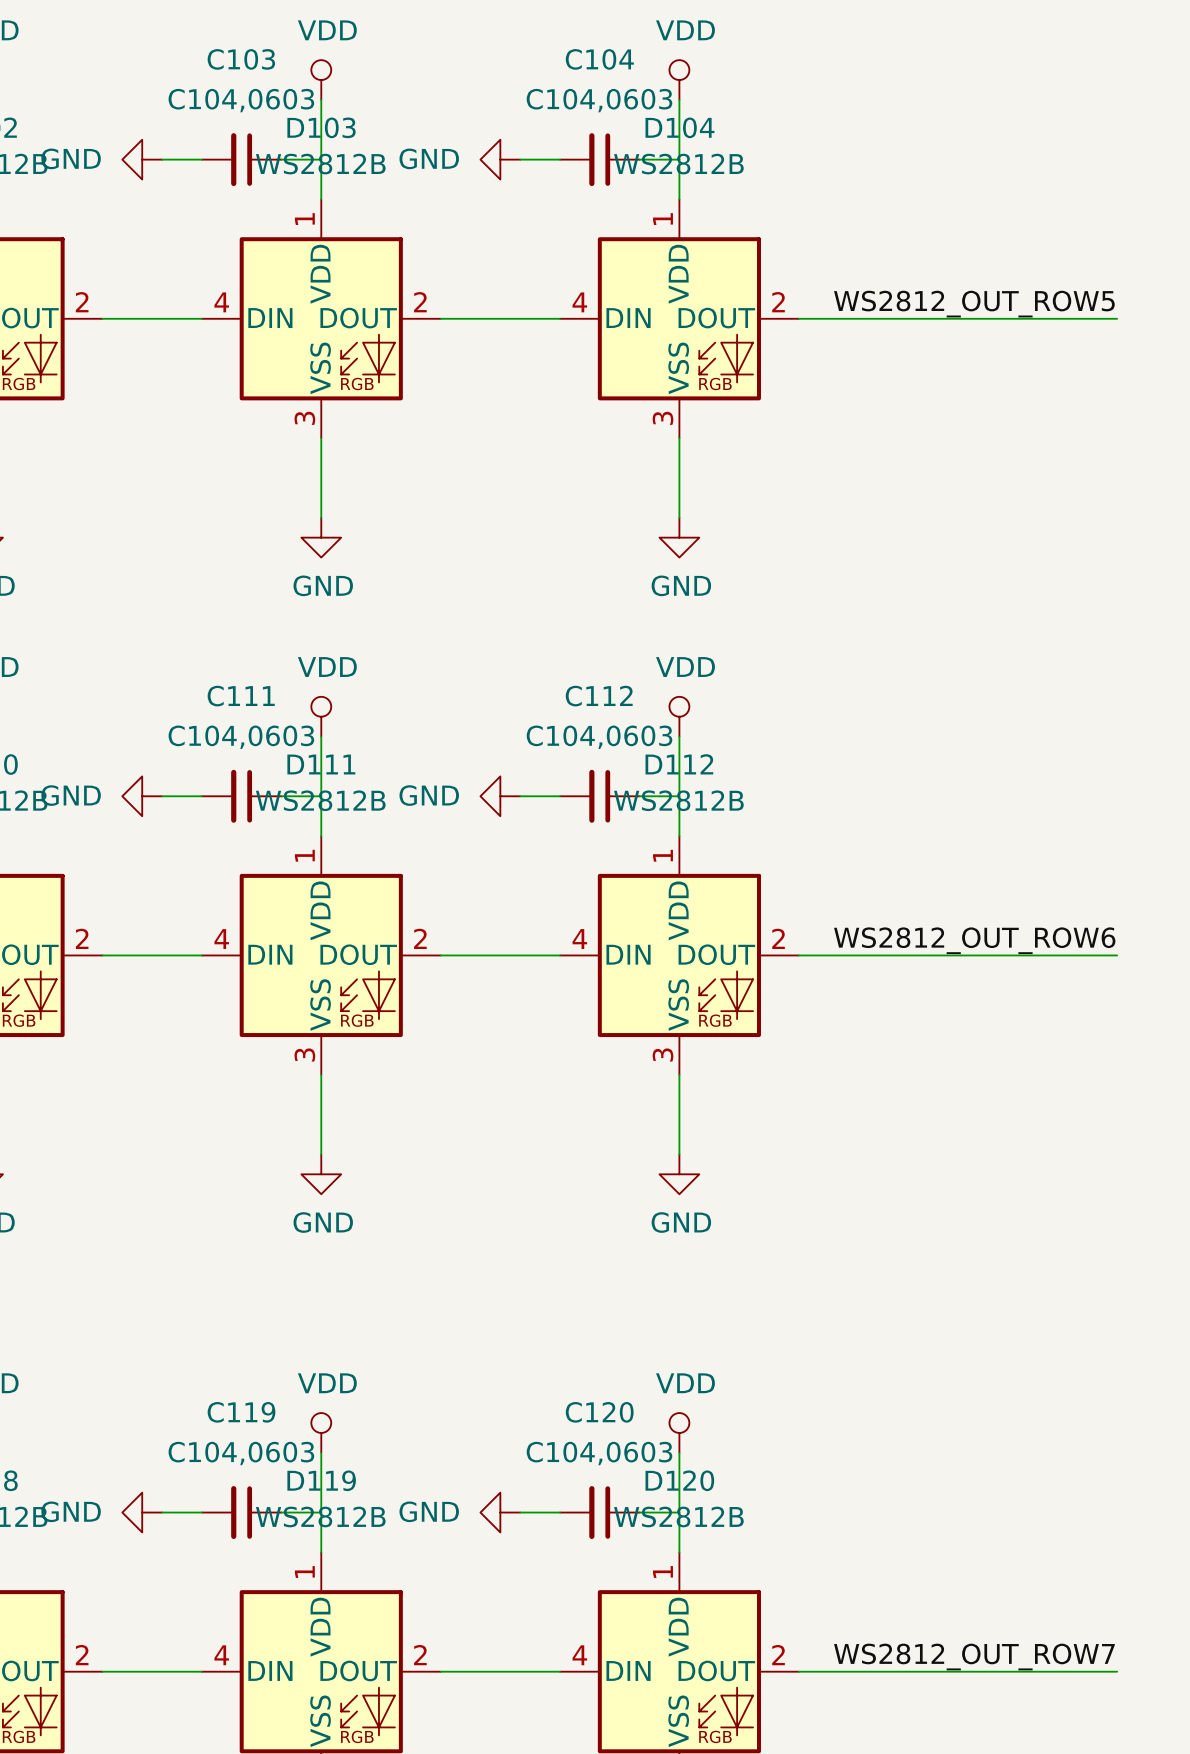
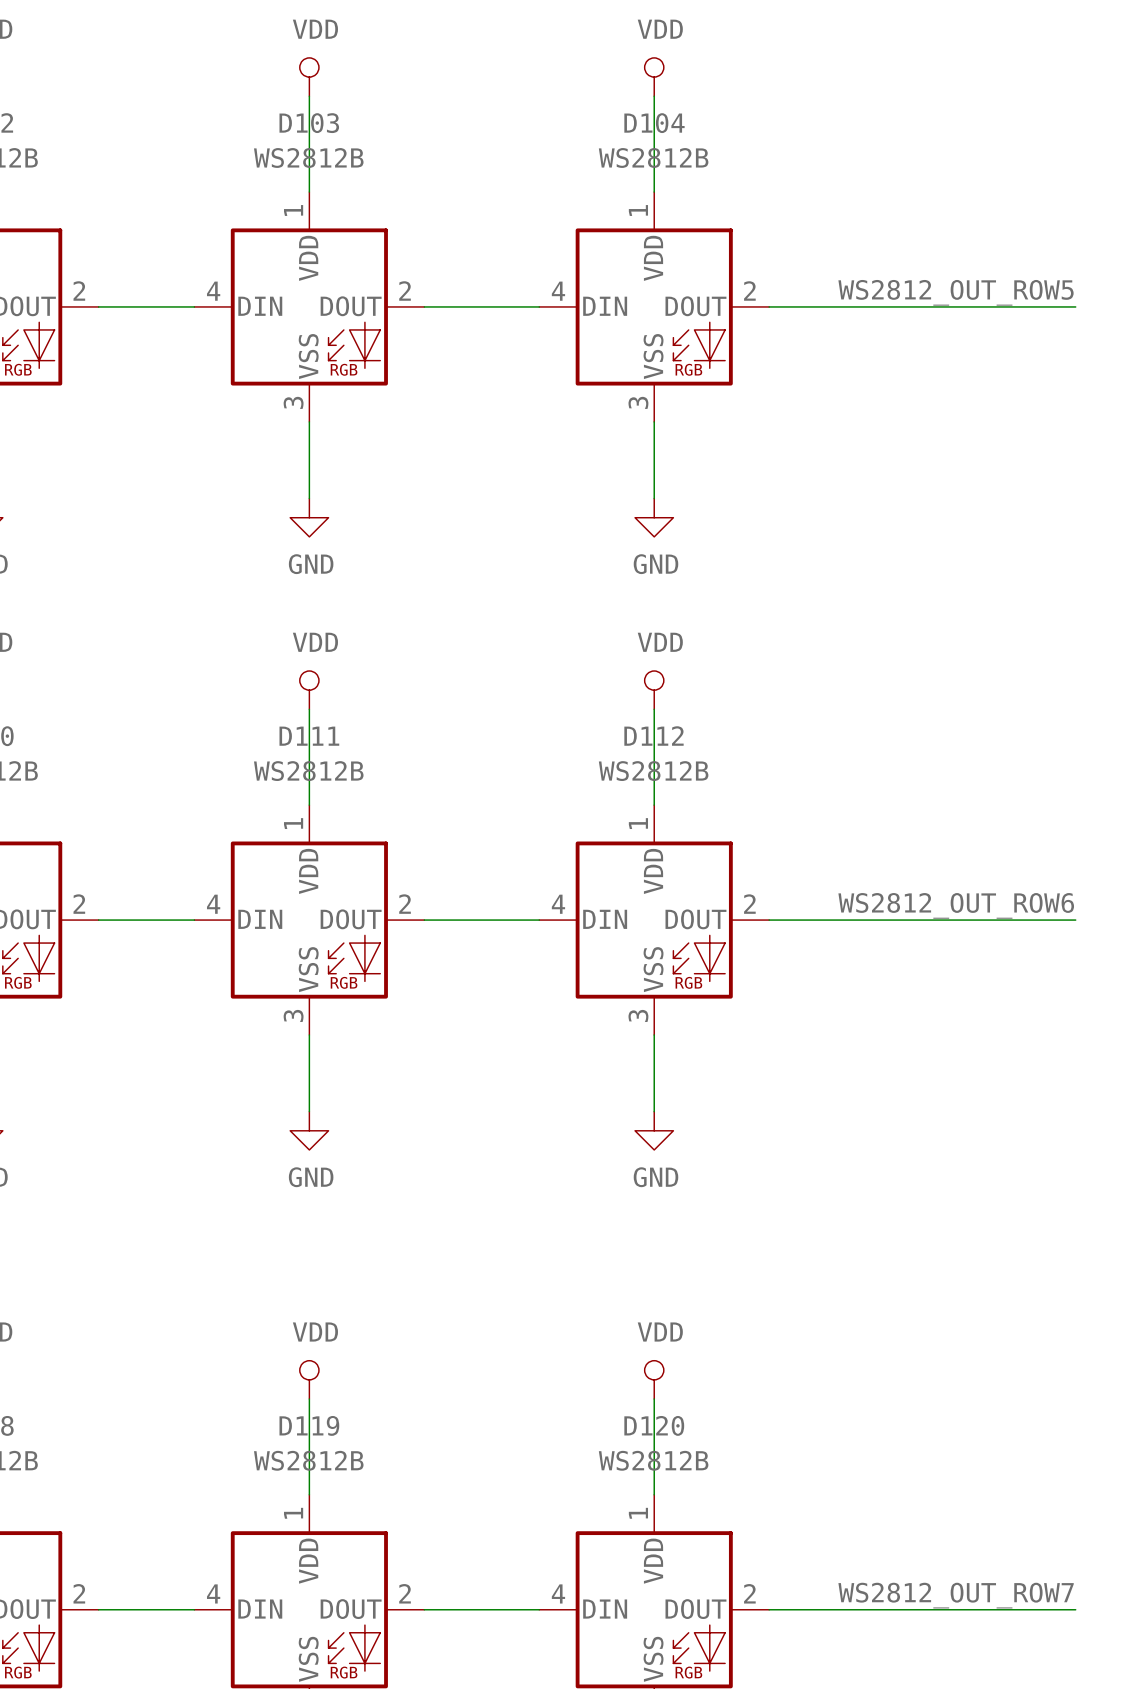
power symbol: GND (142, 159) -> none
wire: (162, 159) (201, 159) -> none
C103: C104,0603 (241, 159) -> none
wire: (281, 159) (321, 159) -> none
power symbol: GND (500, 159) -> none
wire: (520, 159) (560, 159) -> none
C104: C104,0603 (599, 159) -> none
wire: (639, 159) (679, 159) -> none
power symbol: GND (142, 796) -> none
wire: (162, 796) (201, 796) -> none
C111: C104,0603 (241, 796) -> none
wire: (281, 796) (321, 796) -> none
power symbol: GND (500, 796) -> none
wire: (520, 796) (560, 796) -> none
C112: C104,0603 (599, 796) -> none
wire: (639, 796) (679, 796) -> none
power symbol: GND (142, 1512) -> none
wire: (162, 1512) (201, 1512) -> none
C119: C104,0603 (241, 1512) -> none
wire: (281, 1512) (321, 1512) -> none
power symbol: GND (500, 1512) -> none
wire: (520, 1512) (560, 1512) -> none
C120: C104,0603 (599, 1512) -> none
wire: (639, 1512) (679, 1512) -> none

